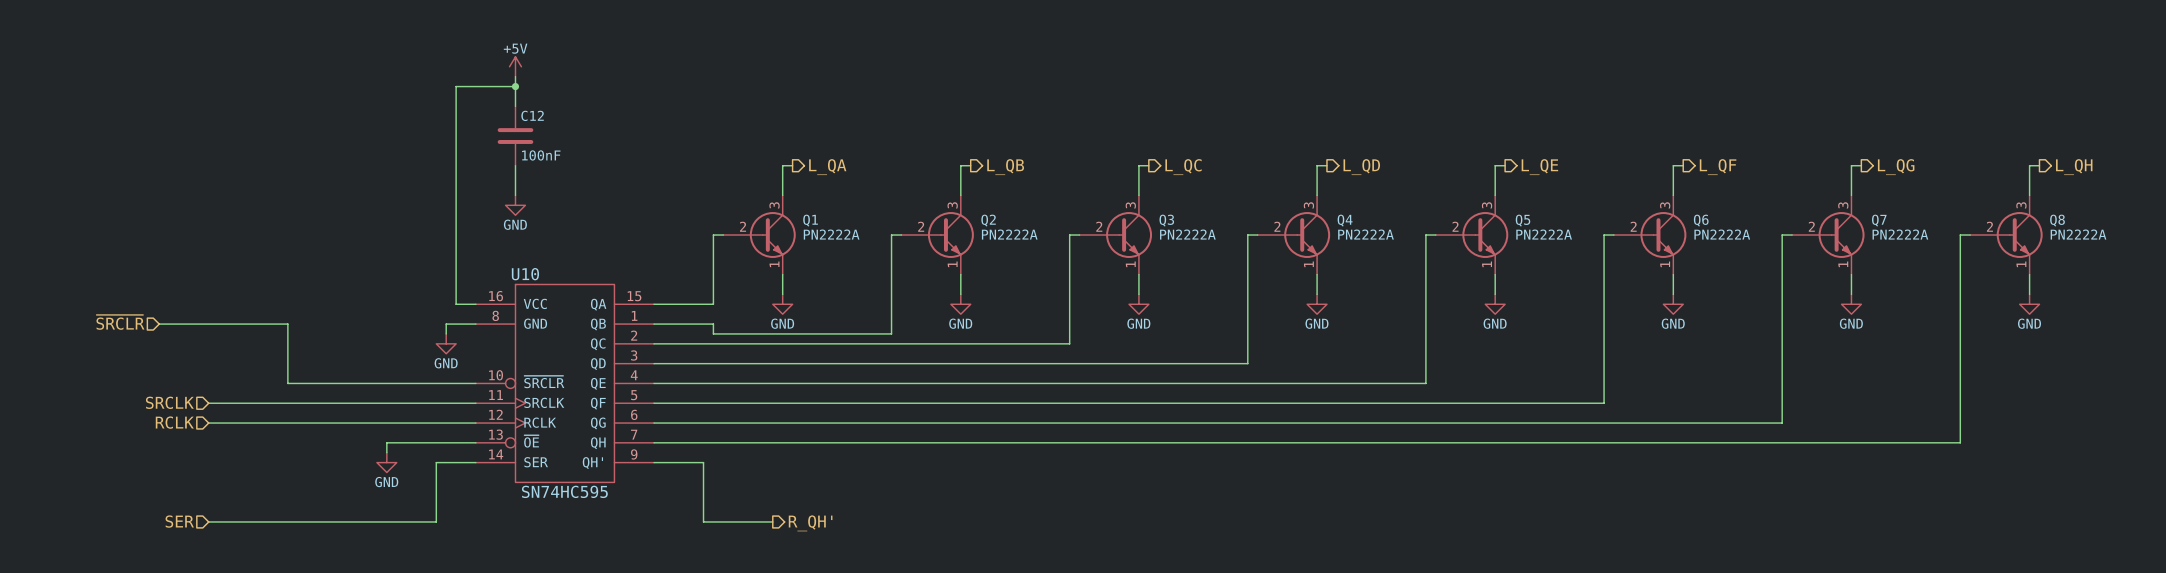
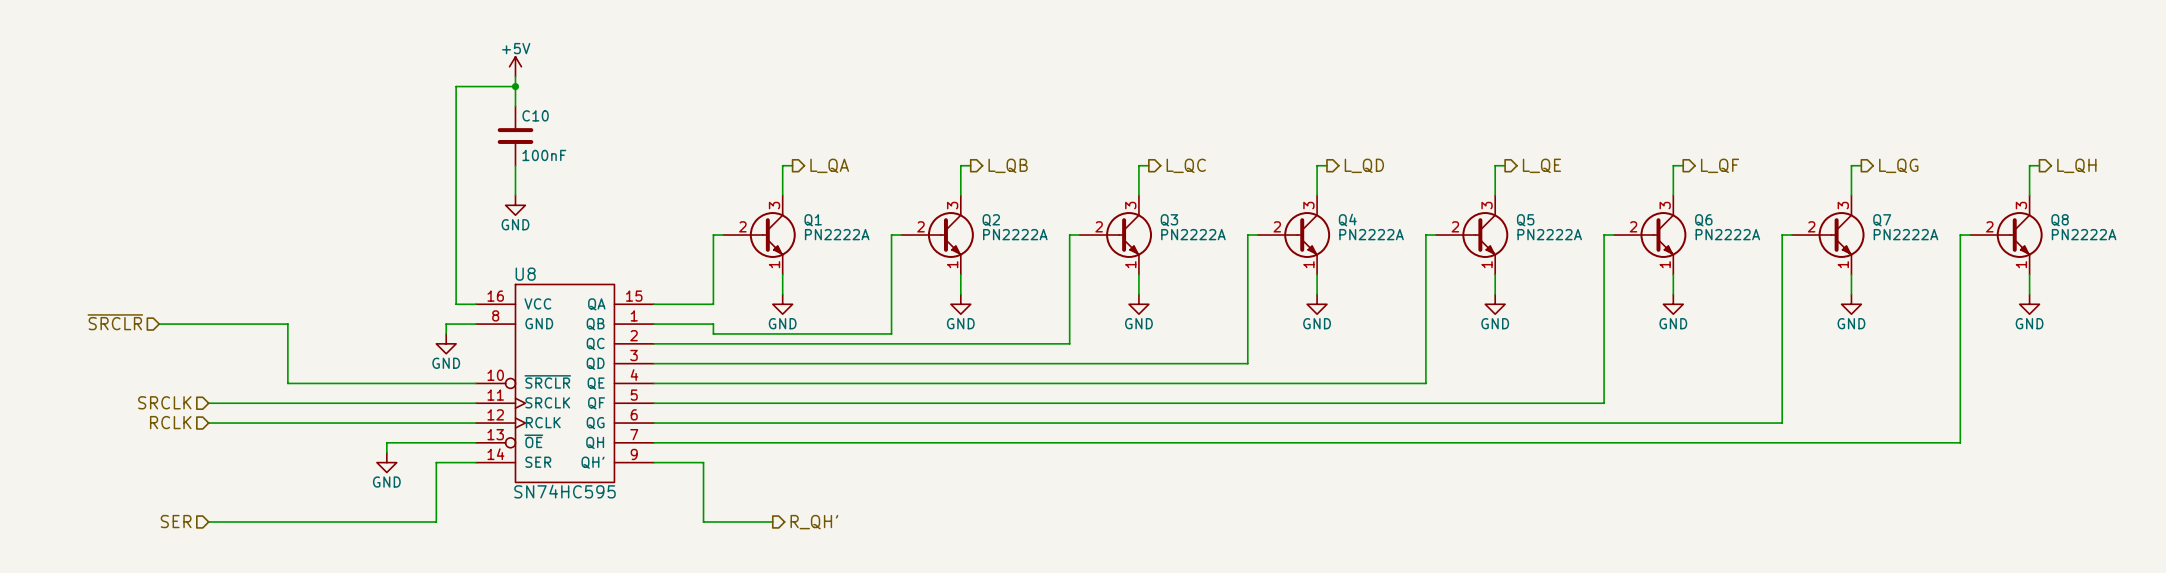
C12 name: C12 (532, 115) -> C10 (535, 115)
U10 name: U10 (525, 274) -> U8 (525, 274)

